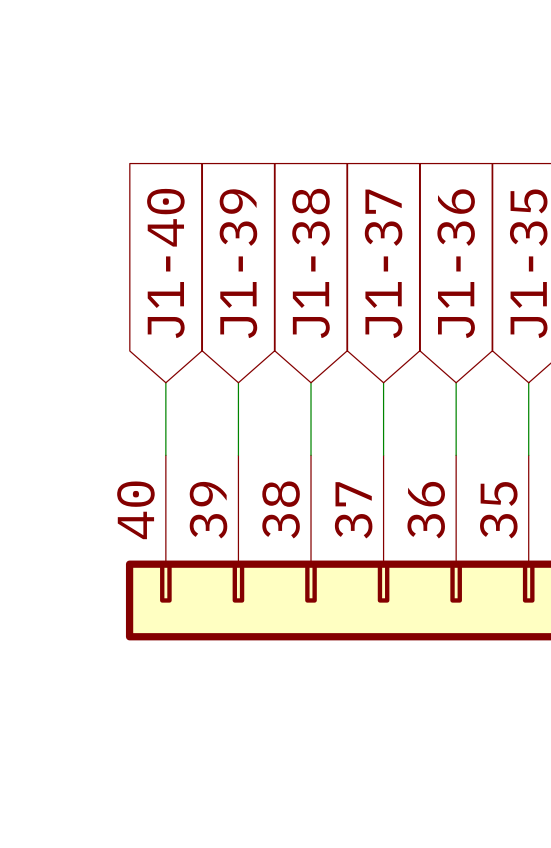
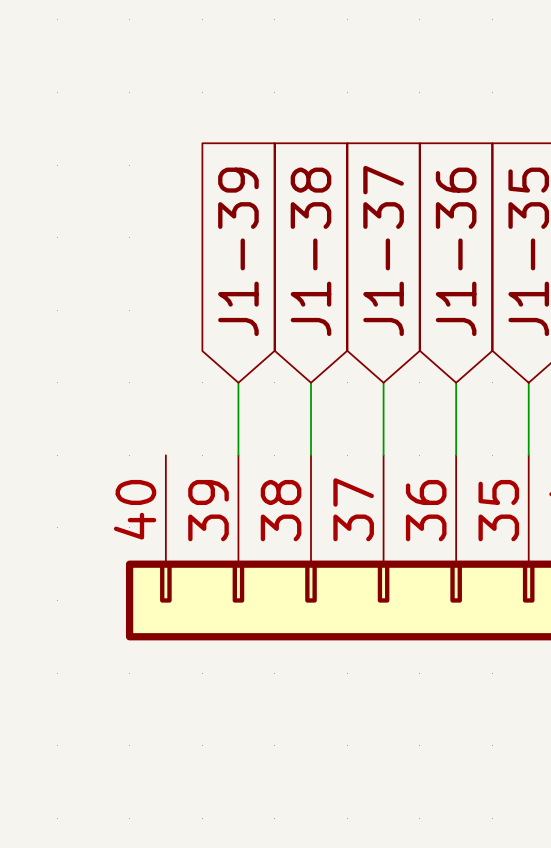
global label: J1-40 (165, 263) -> none
wire: (165, 382) (165, 455) -> none

